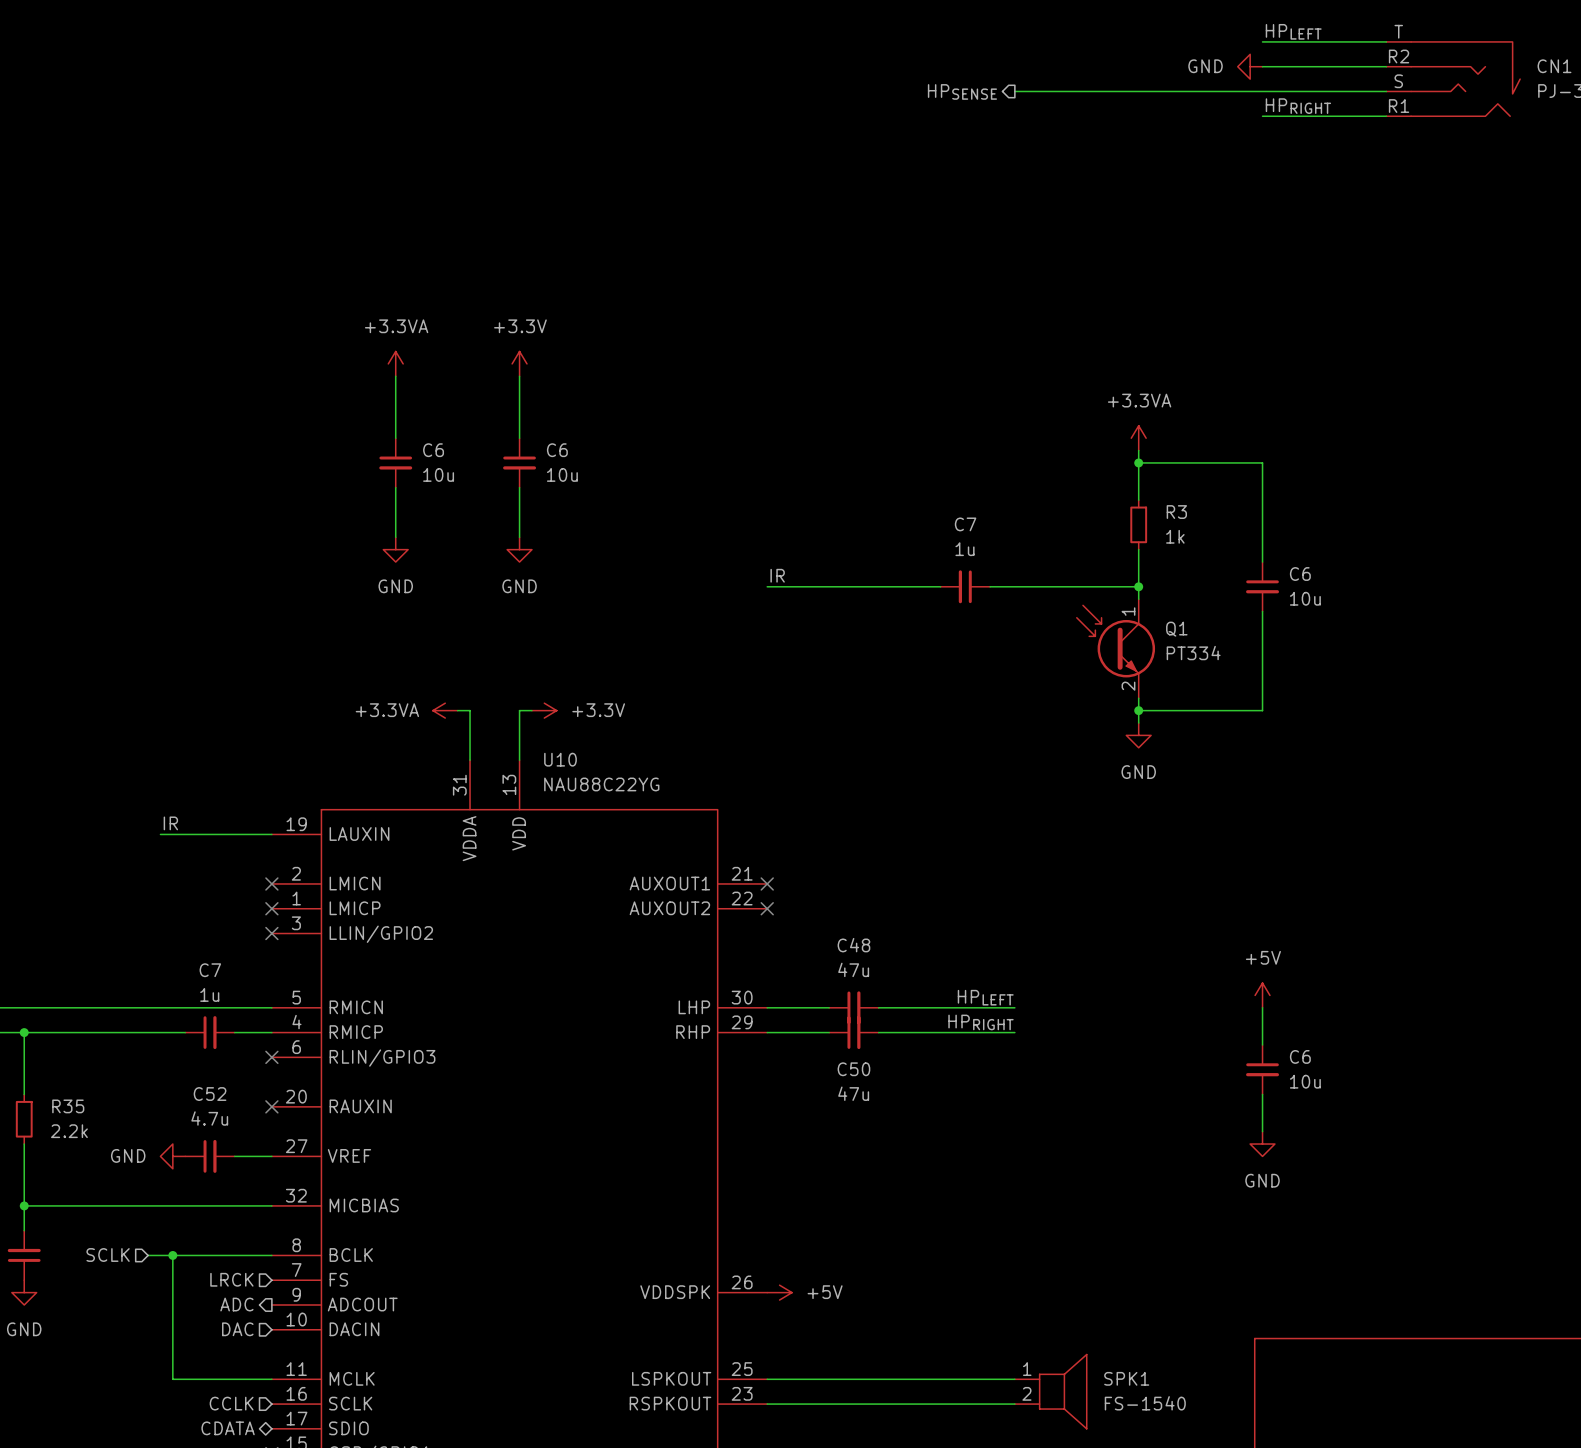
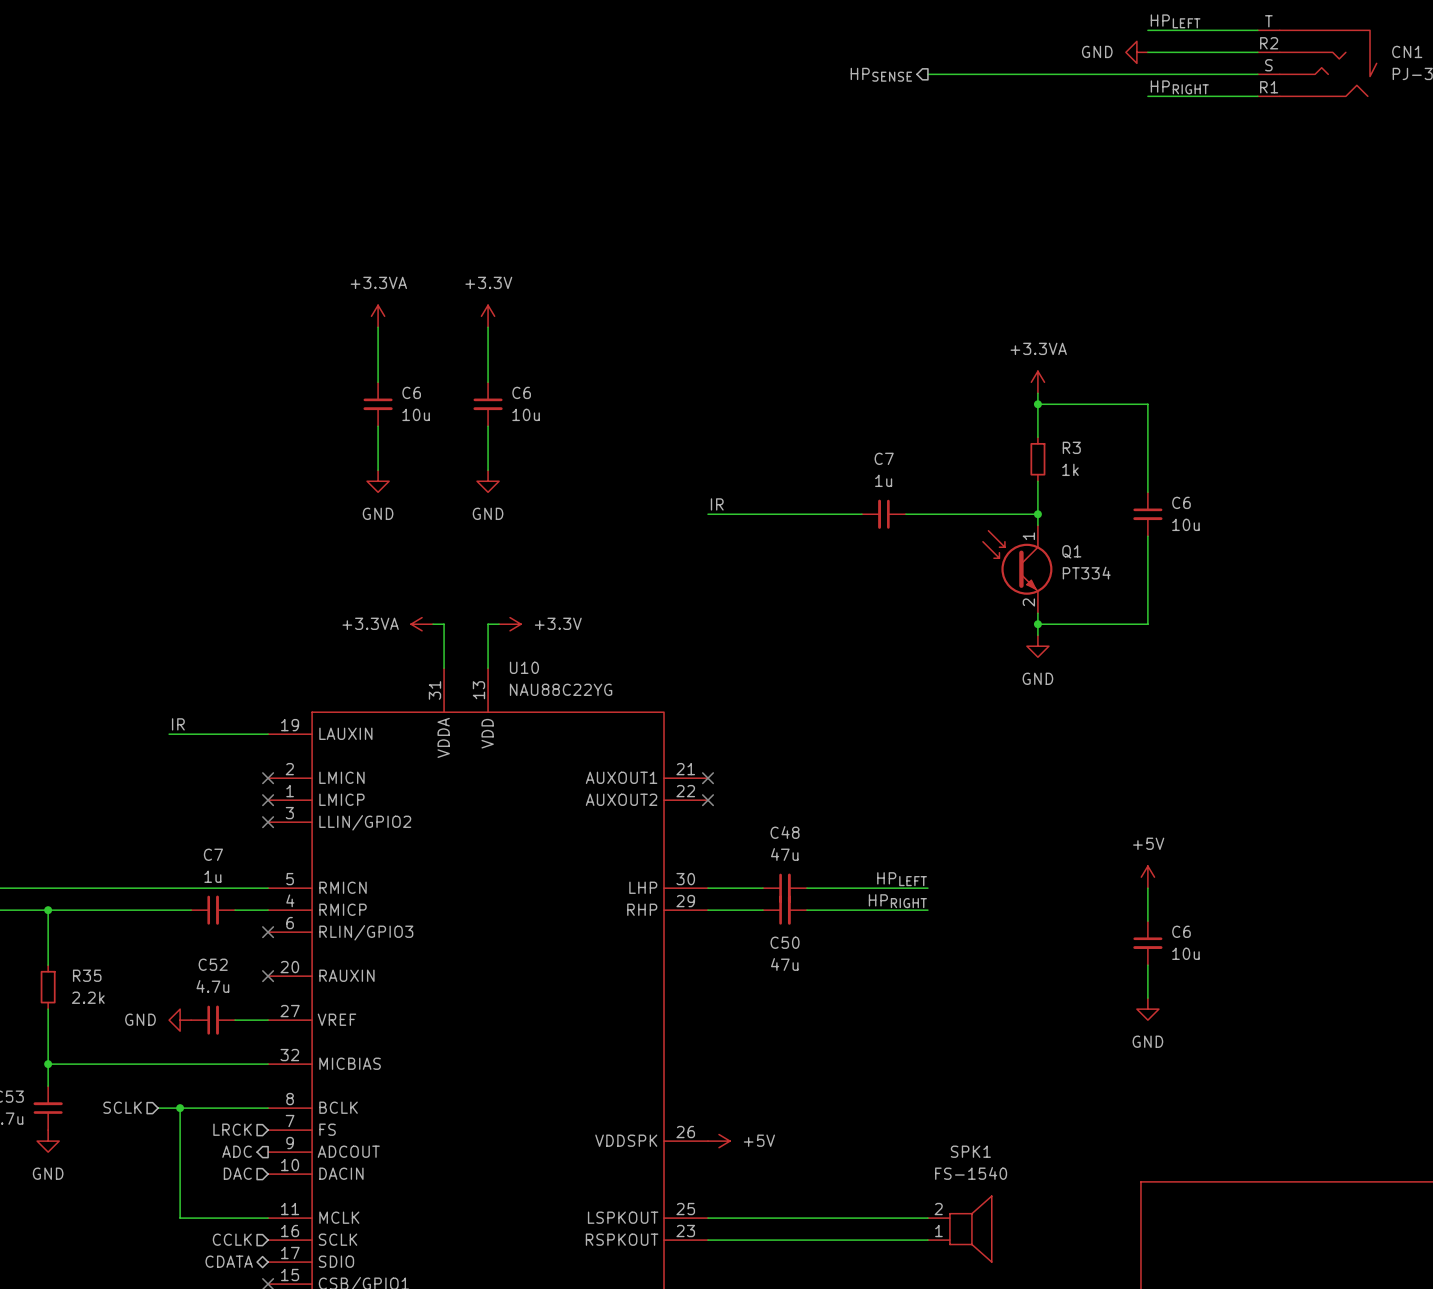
SPK1 name position: SPK1 (1126, 1378) -> SPK1 (970, 1151)
SPK1 flip: as is (1063, 1391) -> up-down (970, 1229)
SPK1 value position: FS-1540 (1145, 1403) -> FS-1540 (971, 1173)

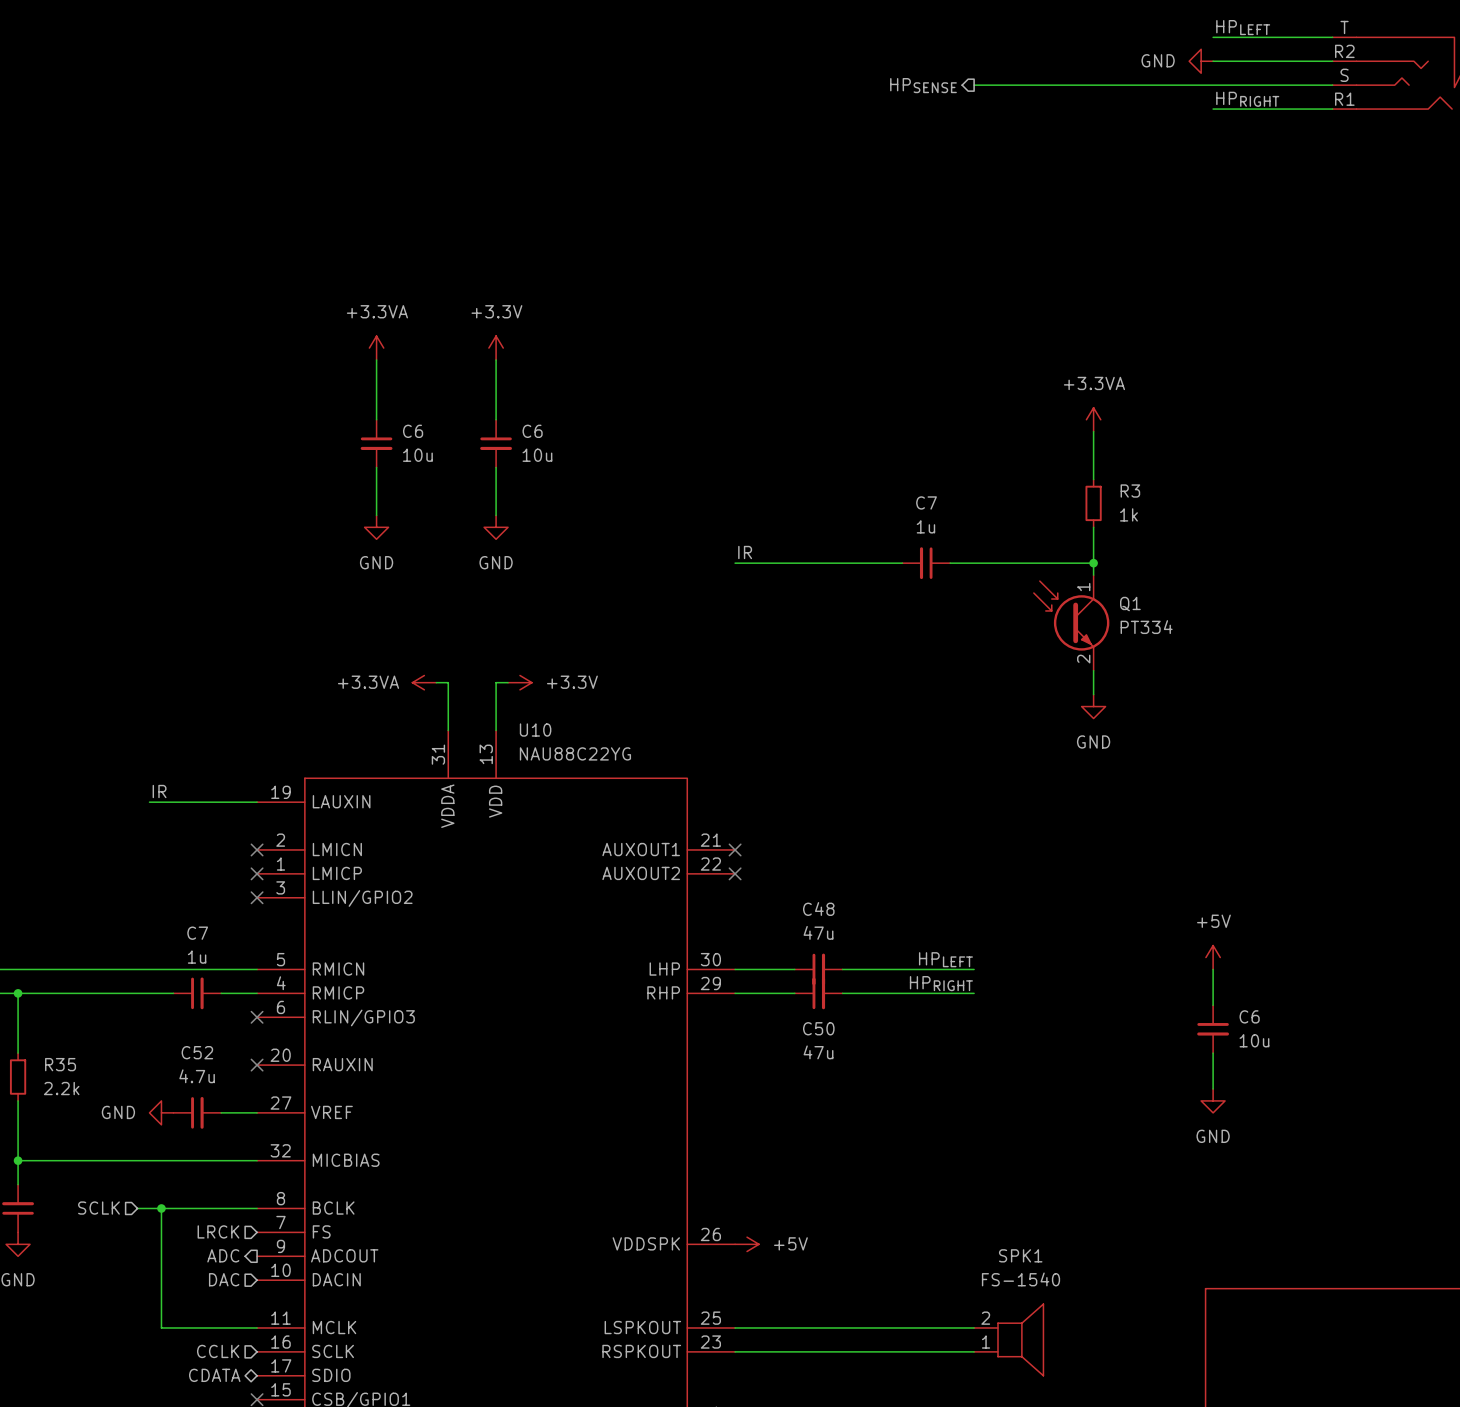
wire: (1037, 404) (1147, 404) (1147, 492) -> none
junction: (1037, 404) -> none
C6: 10u (1147, 514) -> none
wire: (1147, 536) (1147, 624) (1037, 624) -> none
junction: (1037, 624) -> none

